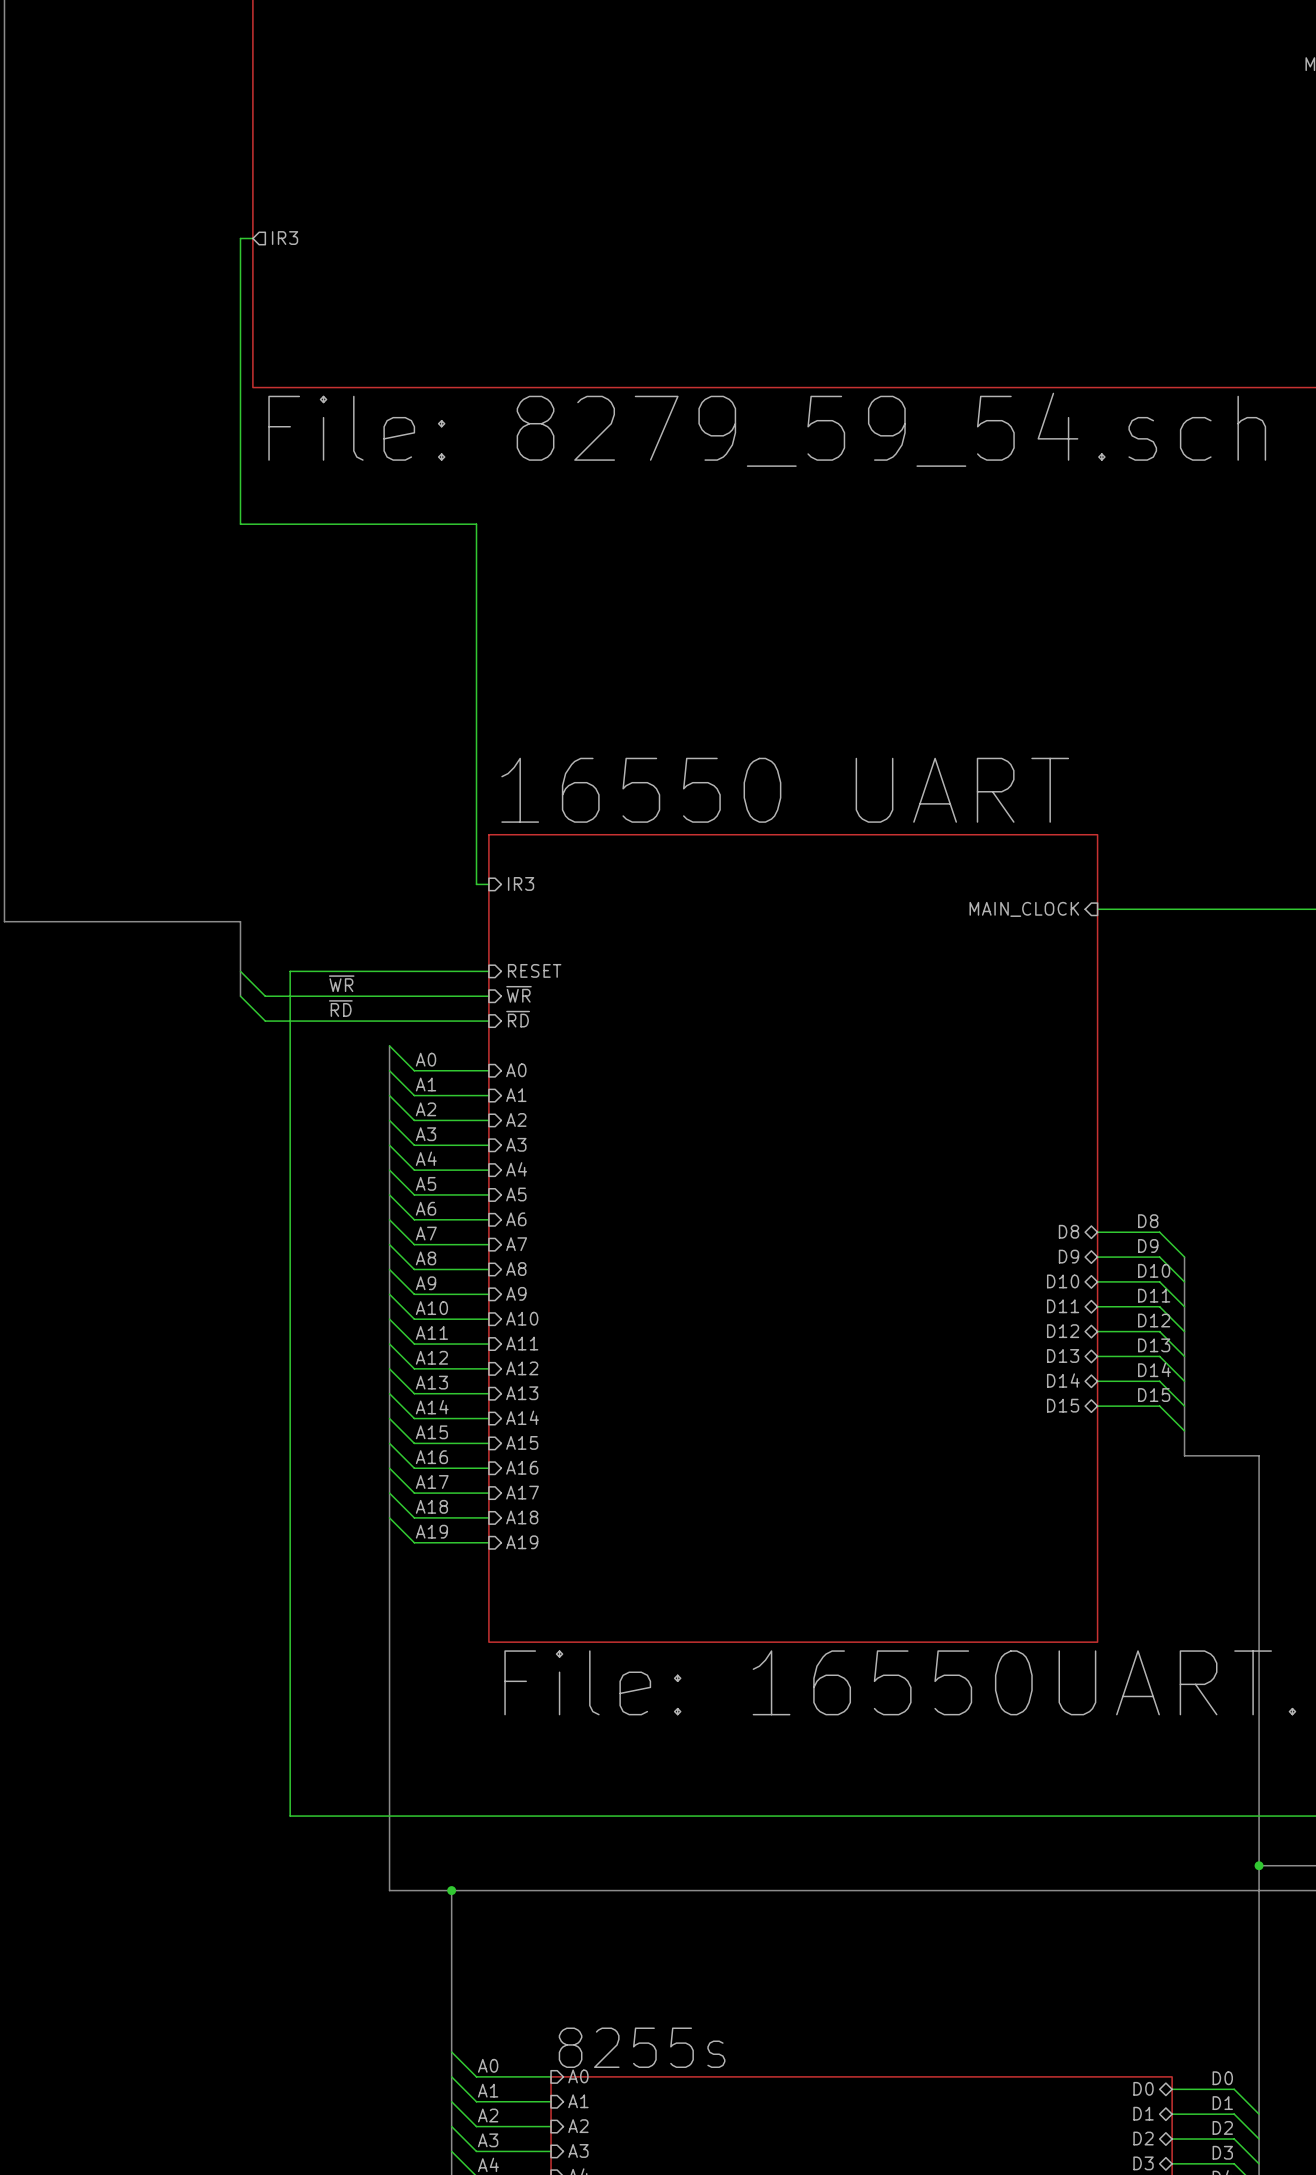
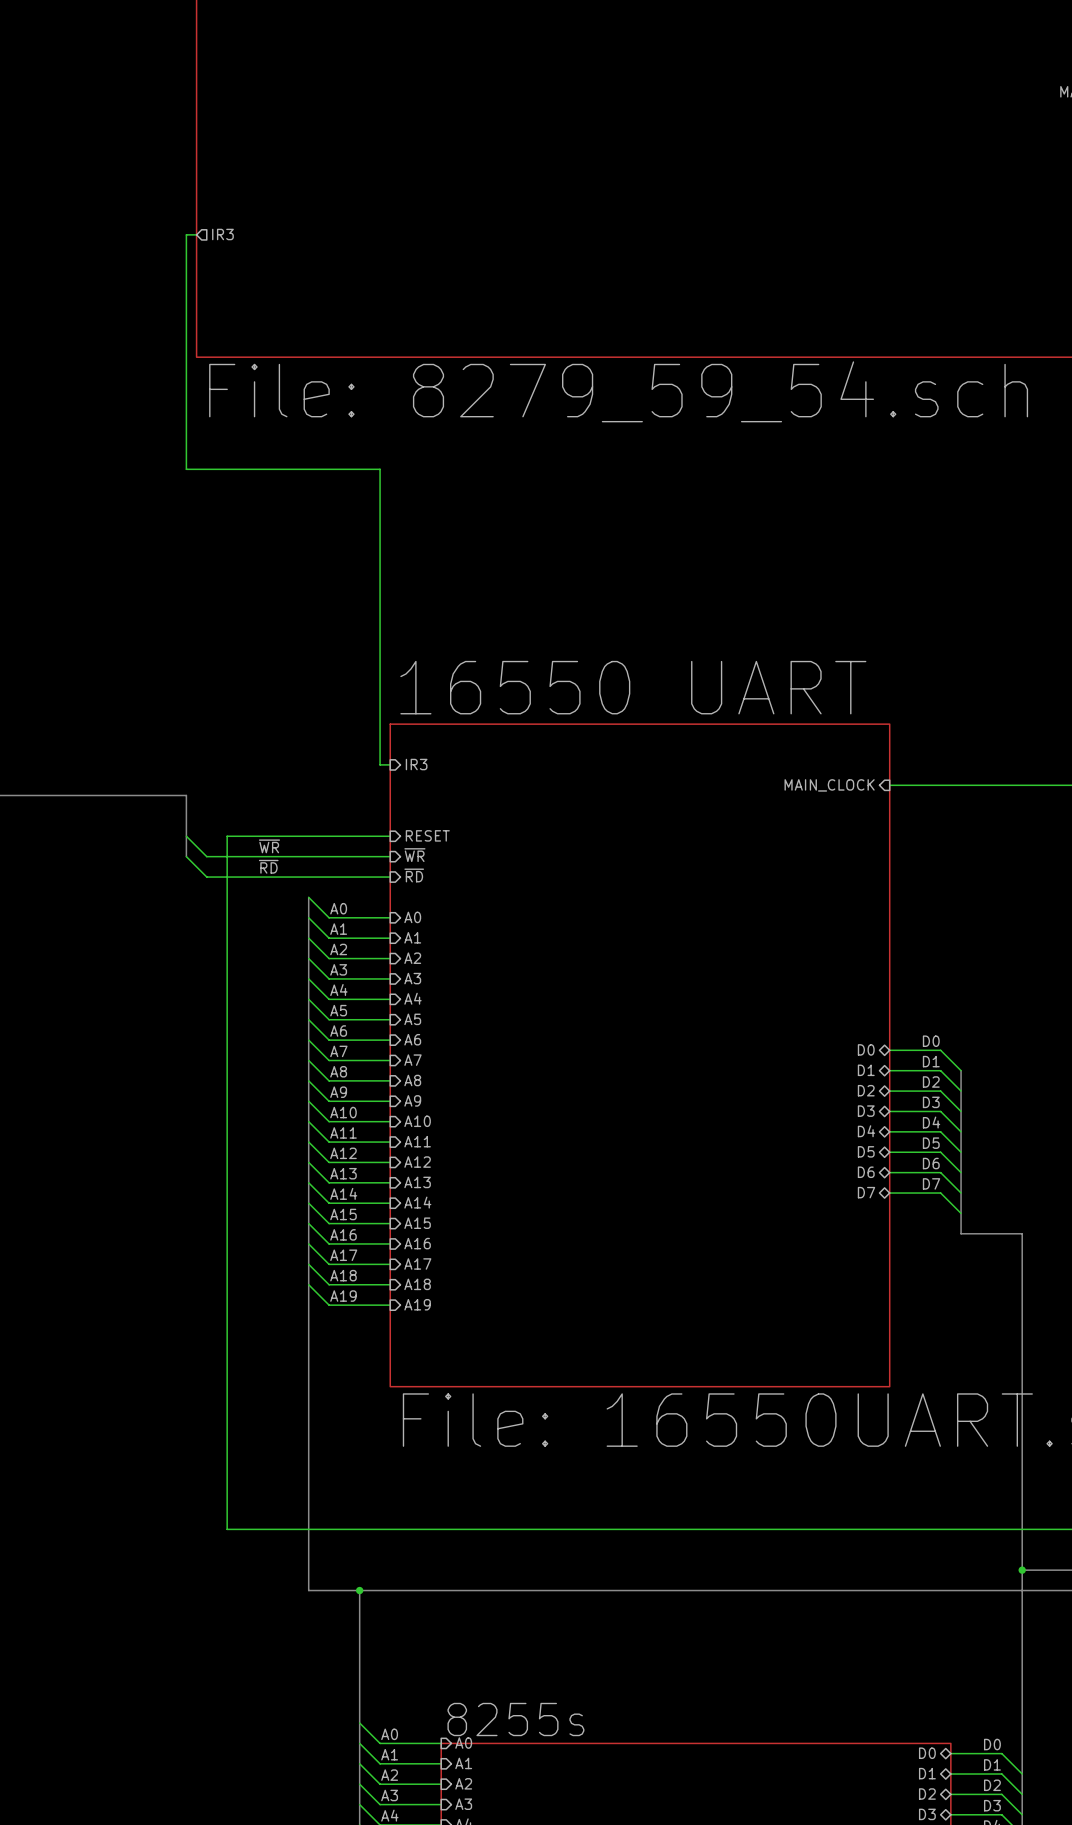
label: D8 (1148, 1221) -> D0 (931, 1041)
sheet pin: D8 (1068, 1231) -> D0 (866, 1049)
label: D9 (1148, 1245) -> D1 (931, 1061)
sheet pin: D9 (1068, 1256) -> D1 (866, 1070)
label: D10 (1154, 1270) -> D2 (931, 1081)
sheet pin: D10 (1063, 1281) -> D2 (866, 1090)
label: D11 (1154, 1295) -> D3 (931, 1102)
sheet pin: D11 (1063, 1306) -> D3 (866, 1111)
label: D12 (1154, 1320) -> D4 (931, 1122)
sheet pin: D12 (1063, 1331) -> D4 (866, 1131)
label: D13 (1154, 1345) -> D5 (931, 1143)
sheet pin: D13 (1063, 1355) -> D5 (866, 1151)
label: D14 (1154, 1369) -> D6 (931, 1163)
sheet pin: D14 (1063, 1380) -> D6 (866, 1172)
label: D15 (1154, 1395) -> D7 (931, 1183)
sheet pin: D15 (1063, 1405) -> D7 (866, 1192)

